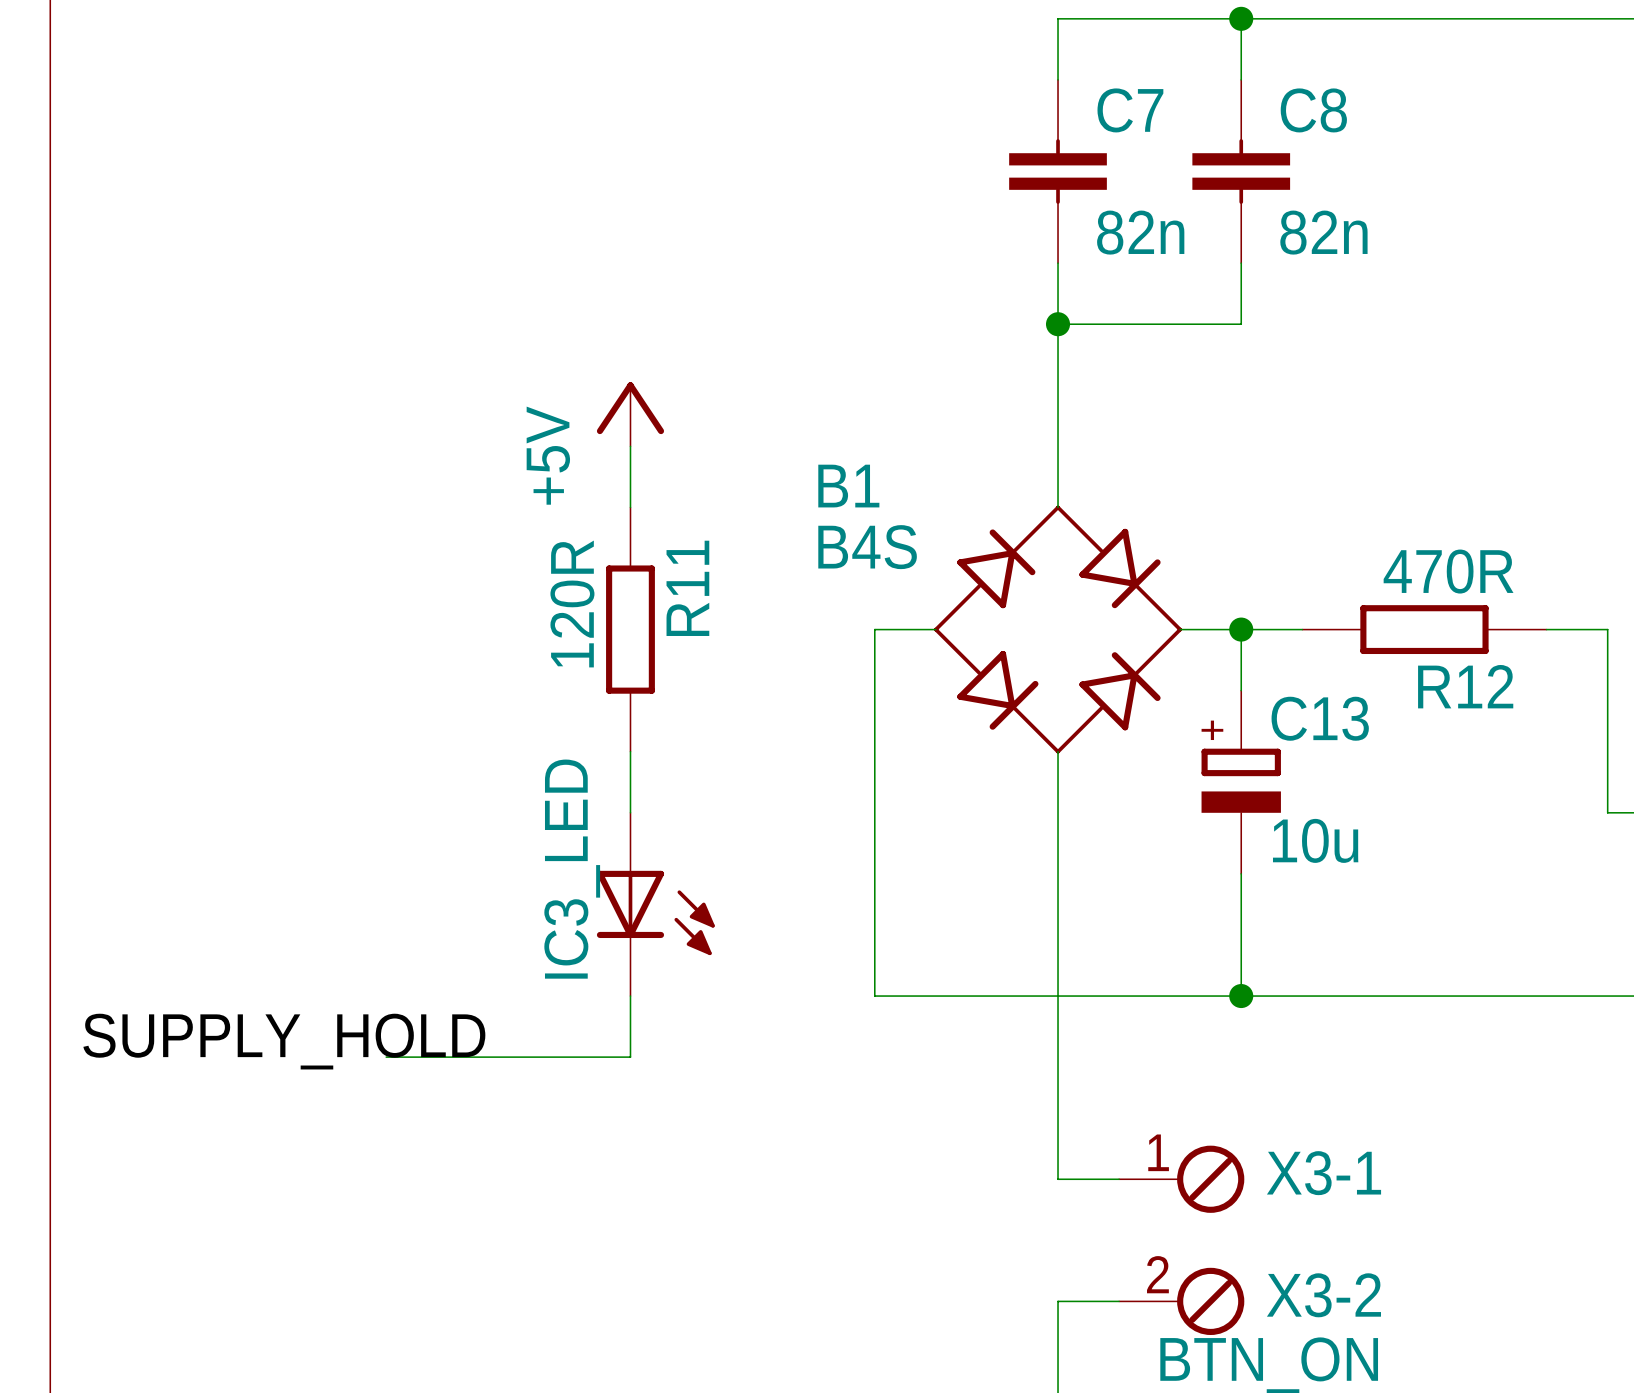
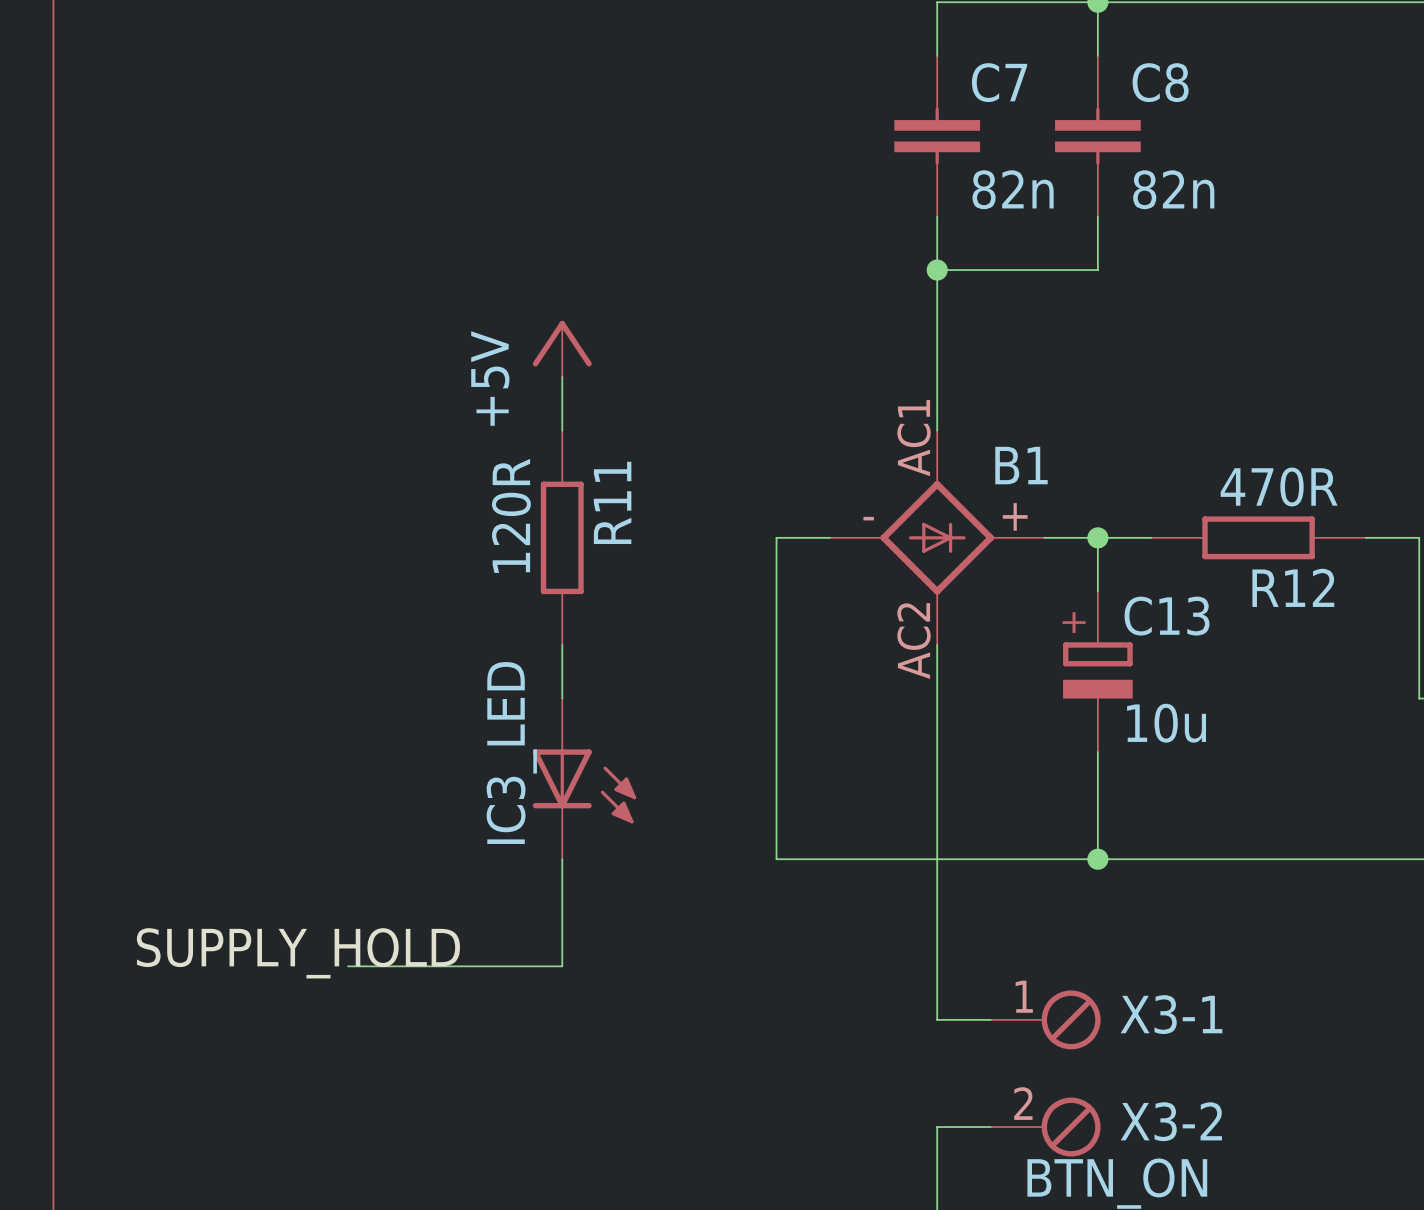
B1 name position: B1 (848, 486) -> B1 (1021, 465)
B1 symbol: [934, 505, 1182, 754] -> [830, 430, 1045, 645]
B1 value: B4S (867, 547) -> none
label position: SUPPLY_HOLD (284, 1041) -> SUPPLY_HOLD (298, 953)
wire: (386, 1057) (630, 1057) -> (348, 966) (562, 966) (562, 912)

